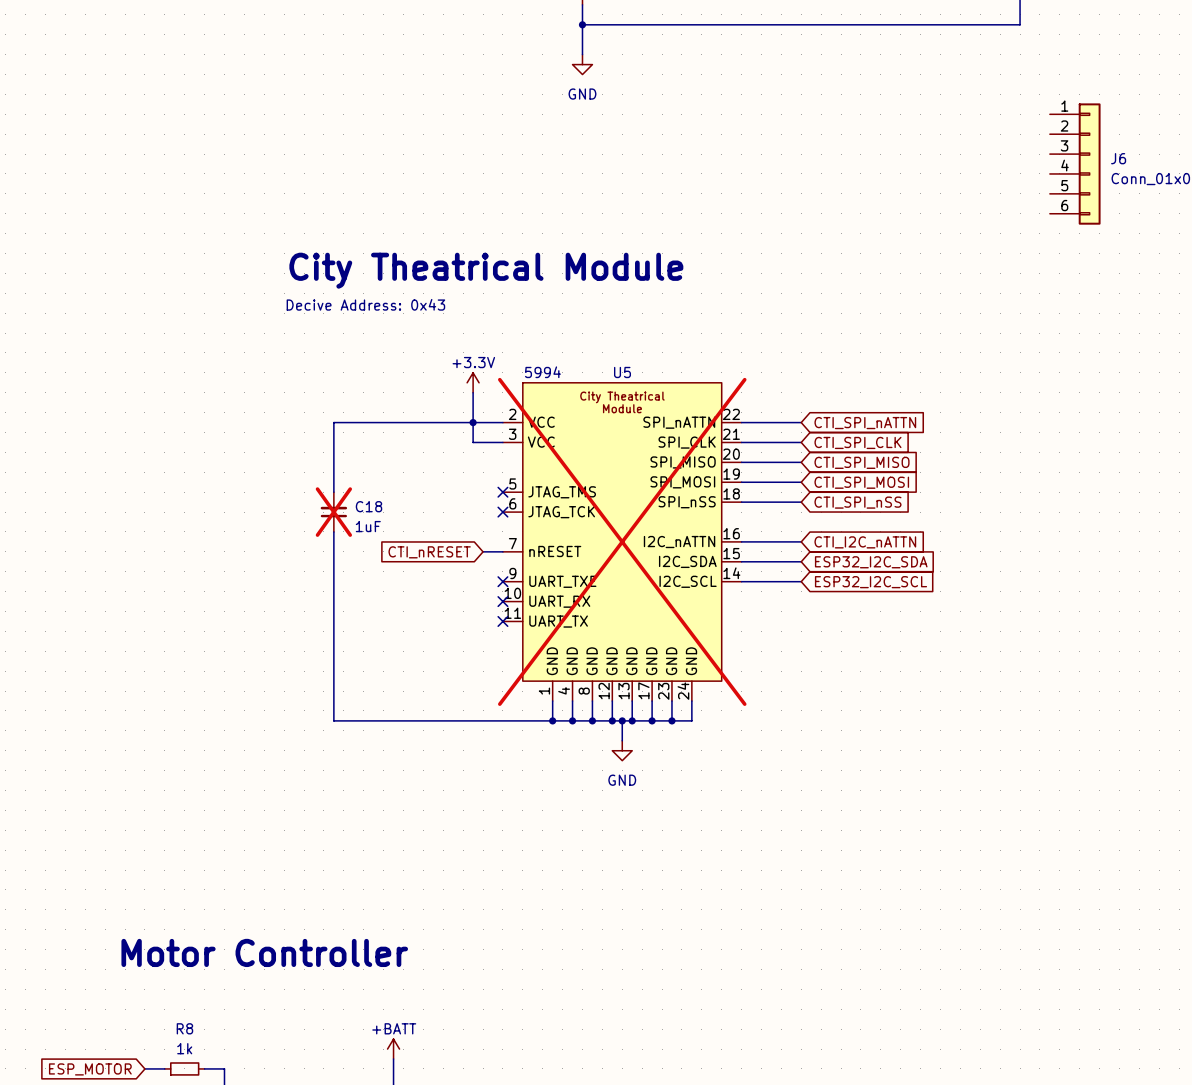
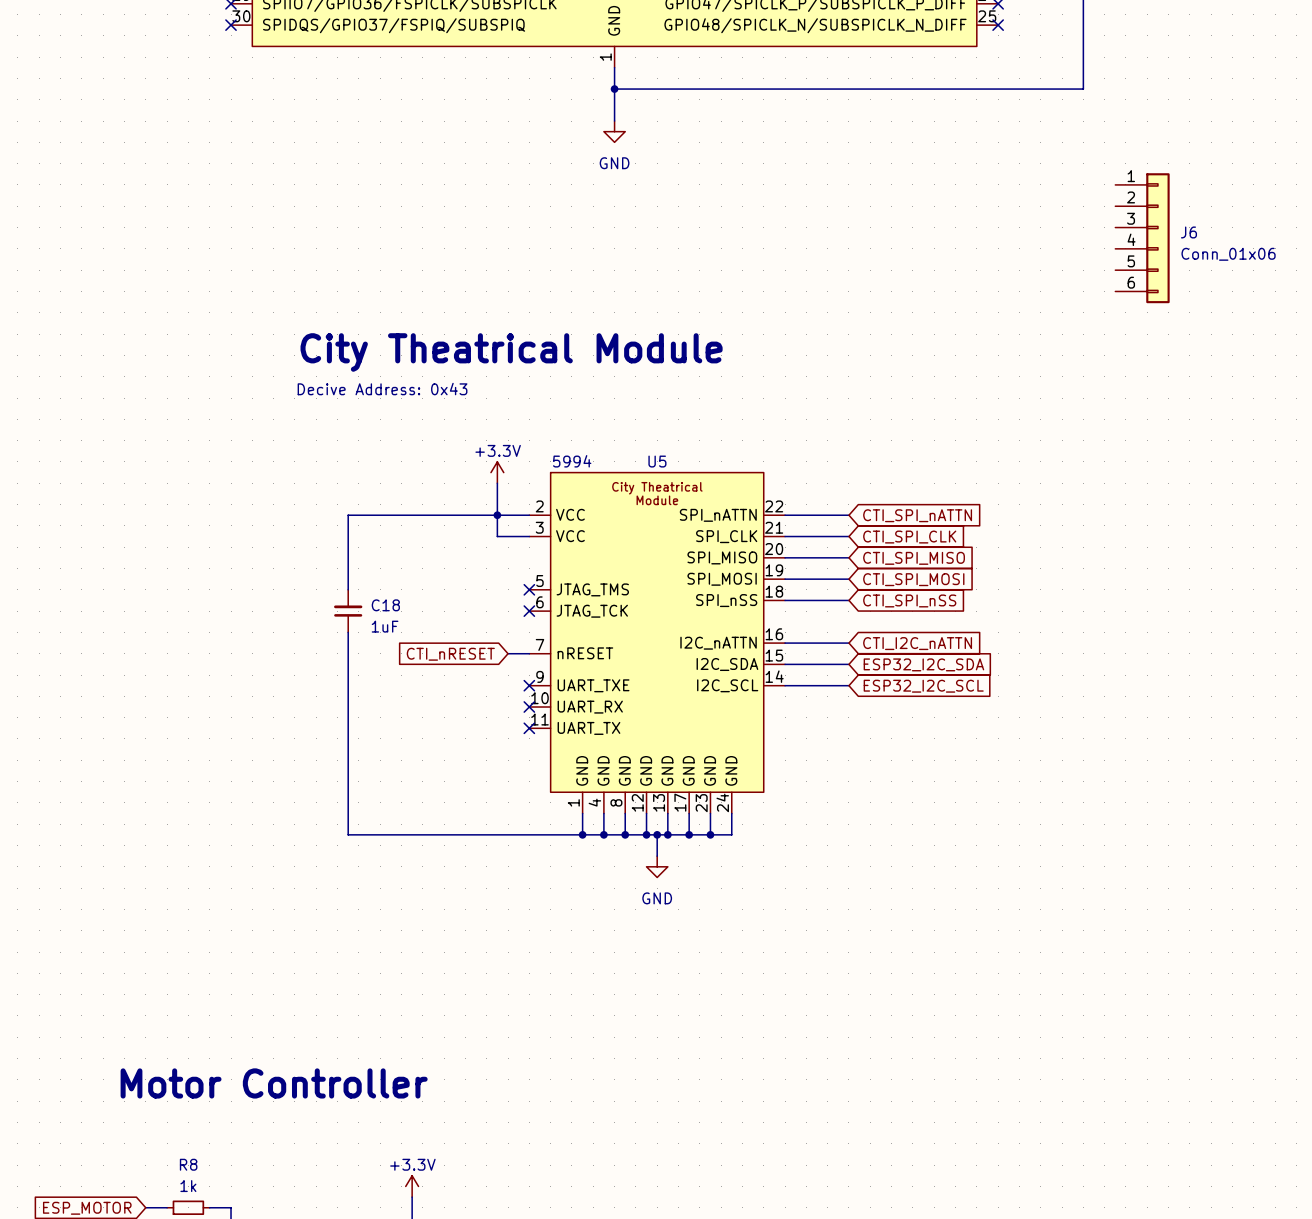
C18 do-not-place cross: (333, 512) -> none
U5 do-not-place cross: (622, 541) -> none
power symbol: +BATT (393, 1049) -> +3.3V (412, 1186)

